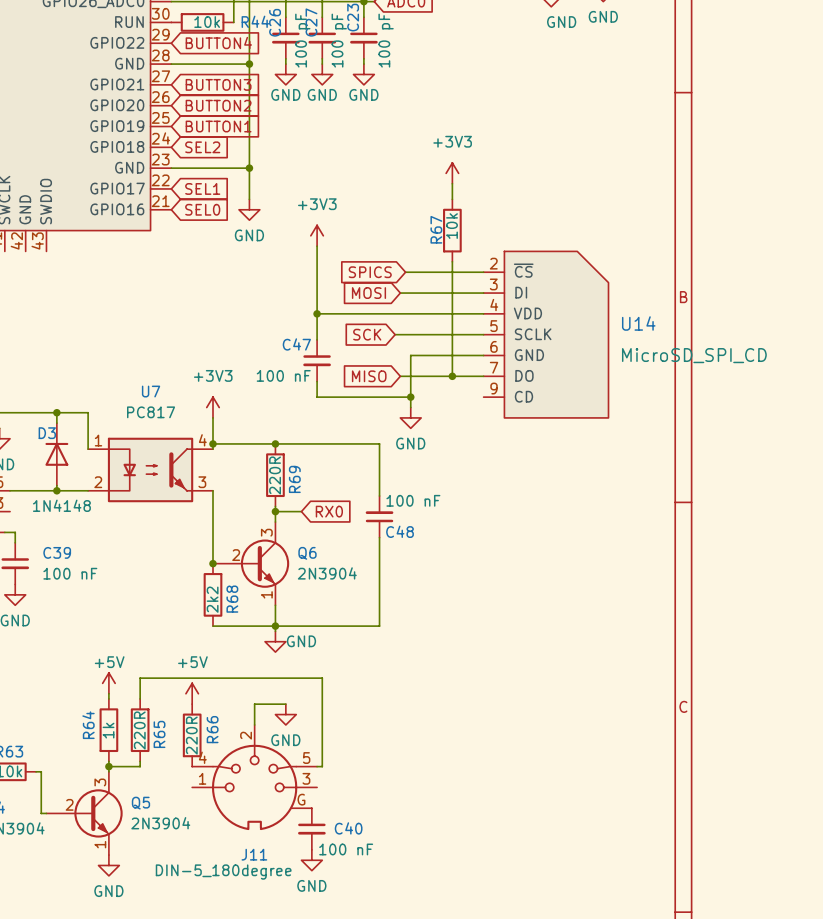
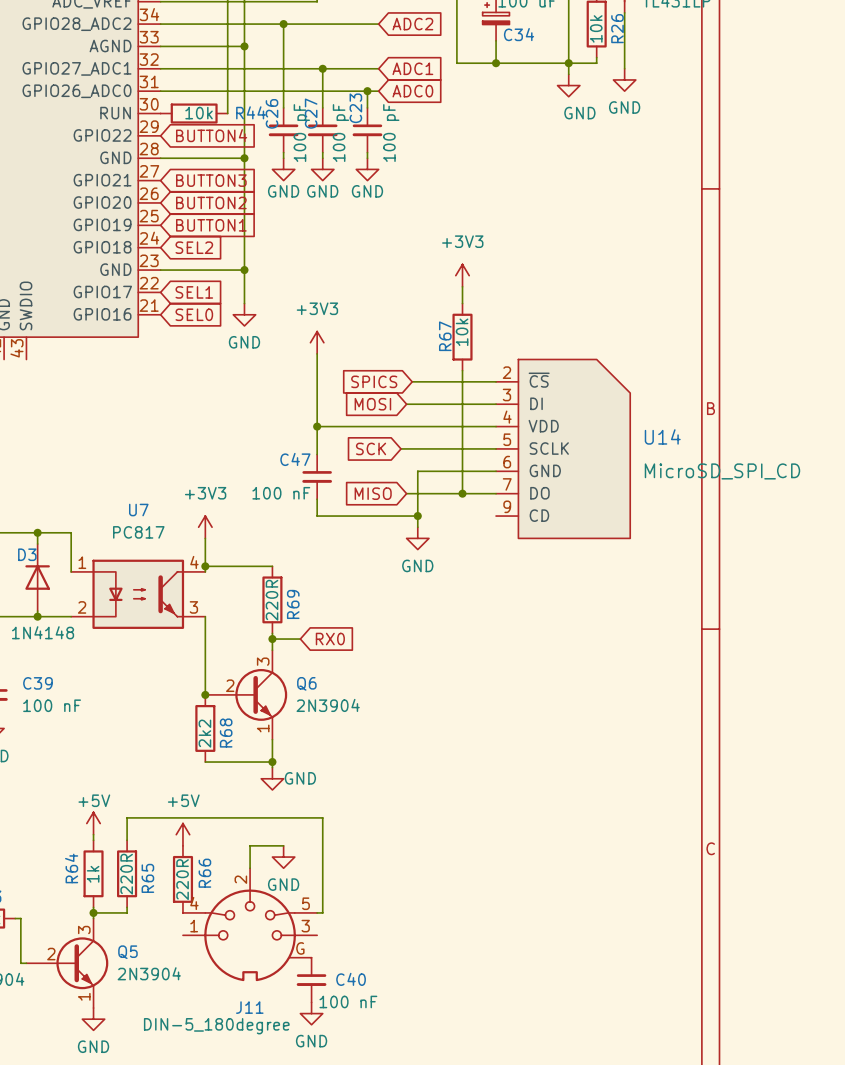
wire: (275, 443) (379, 443) (379, 496) -> none
junction: (275, 443) -> none
C48: 100 nF (379, 516) -> none
wire: (379, 537) (379, 626) (275, 626) -> none

